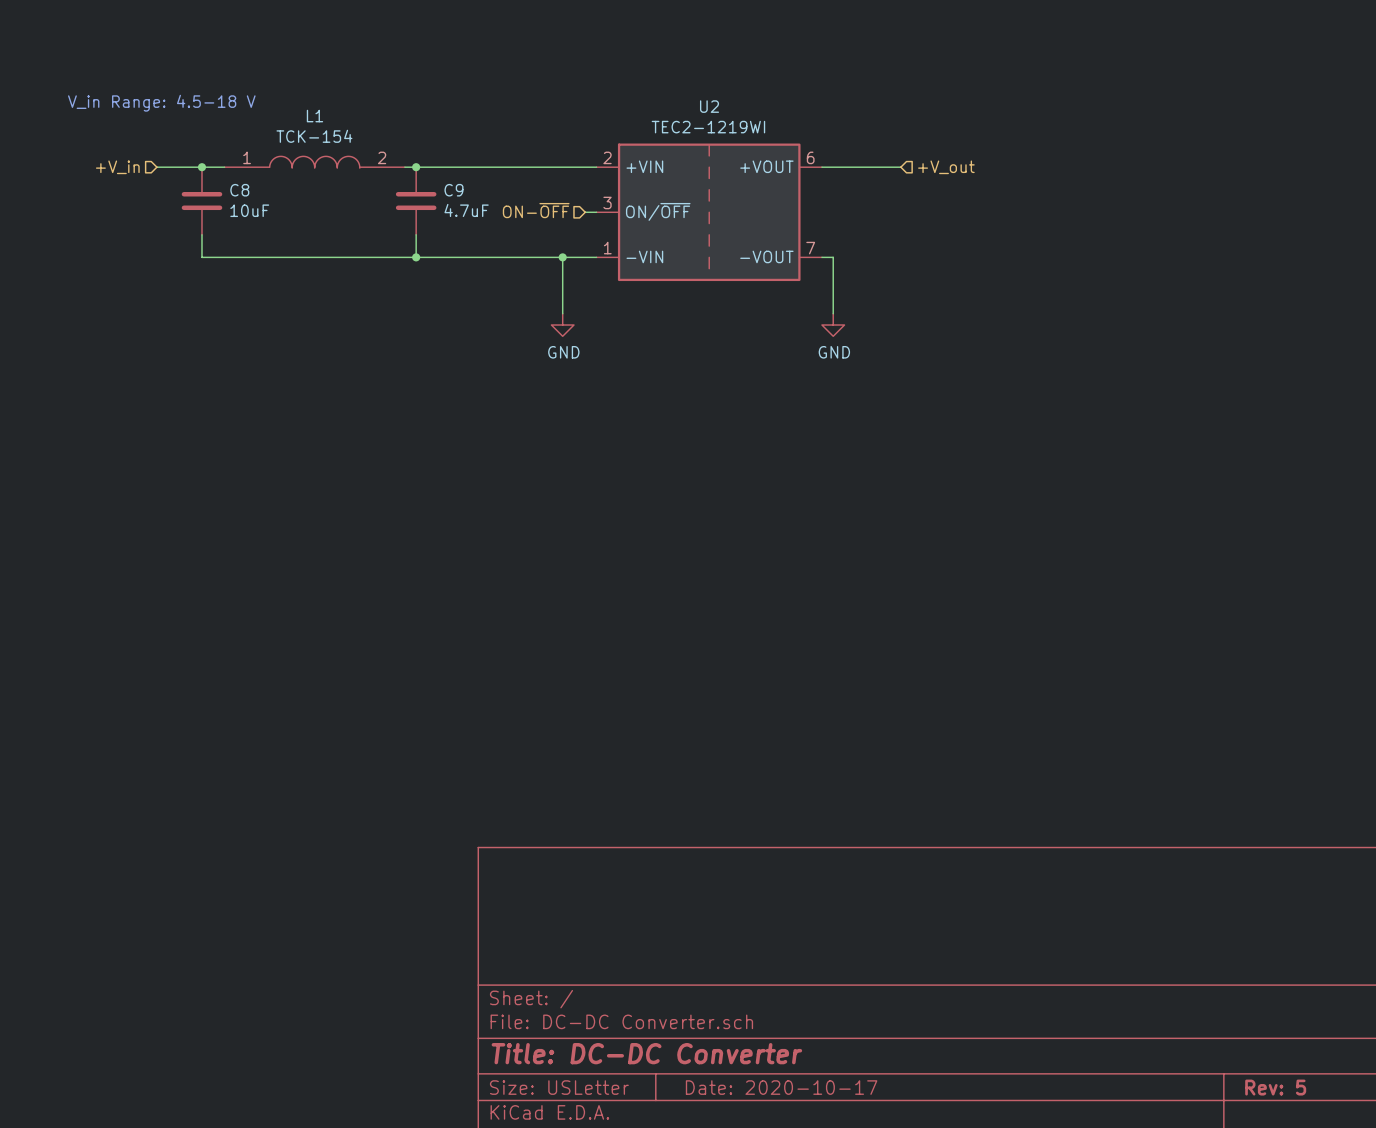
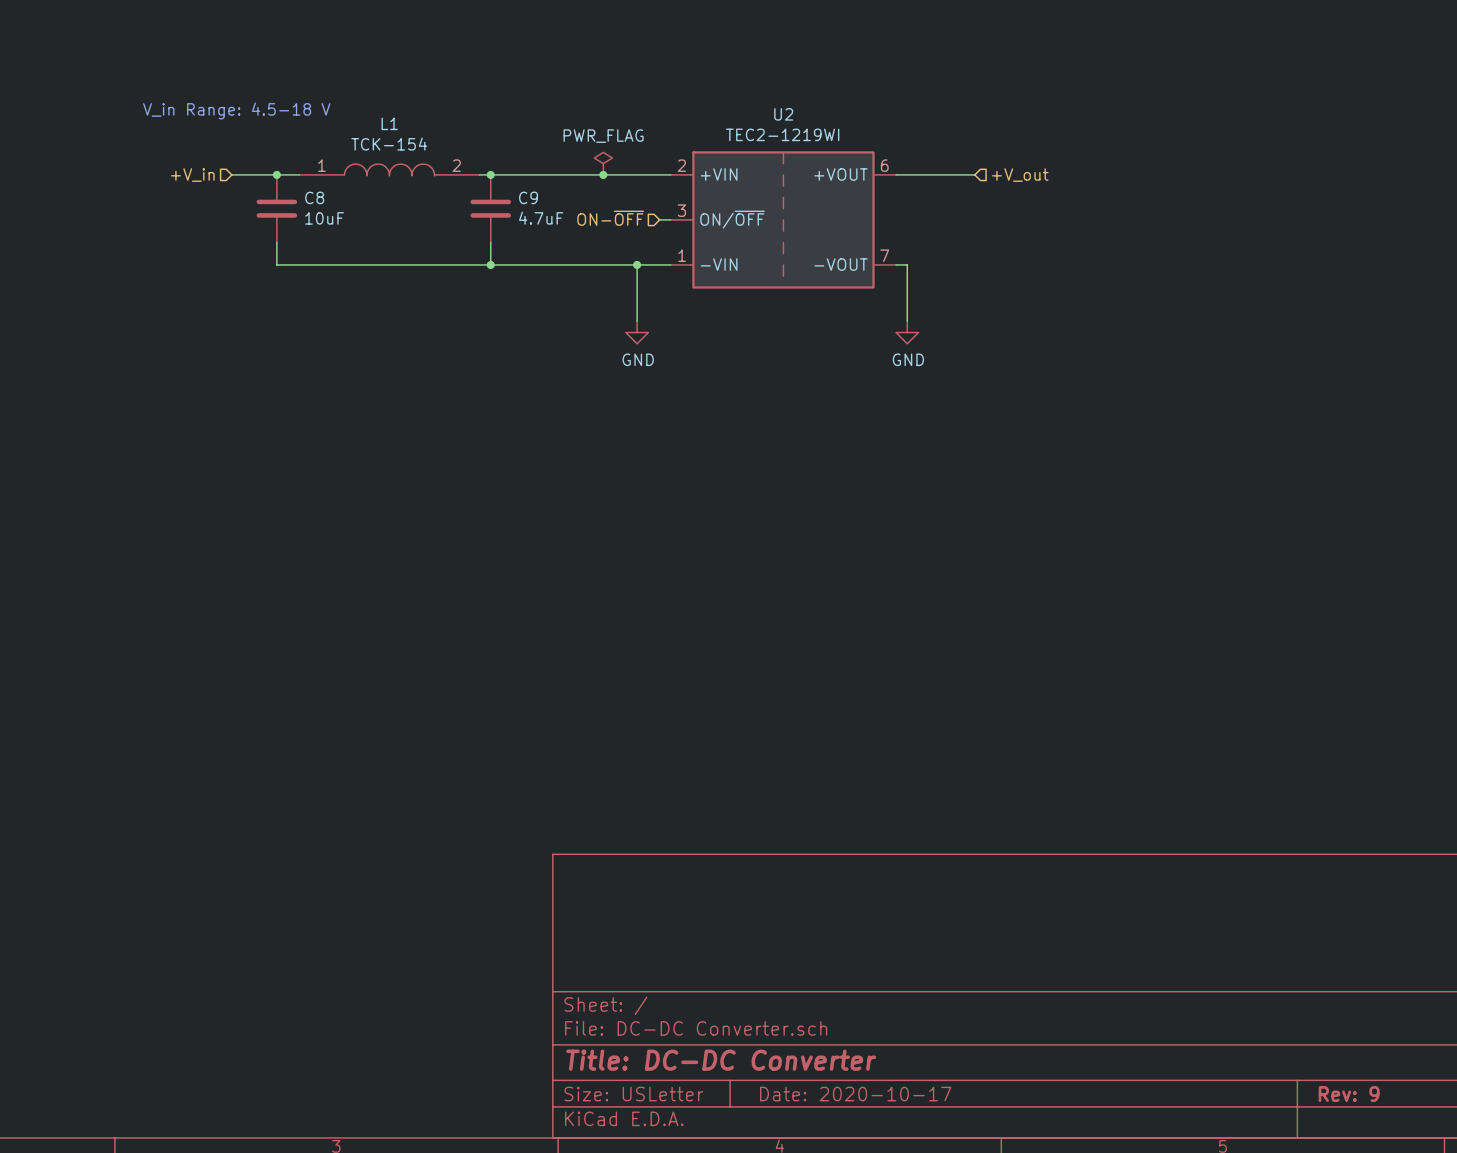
power symbol: none -> PWR_FLAG (603, 163)
junction: none -> (603, 174)
title block: Rev: 5 (1275, 1087) -> Rev: 9 (1349, 1094)

